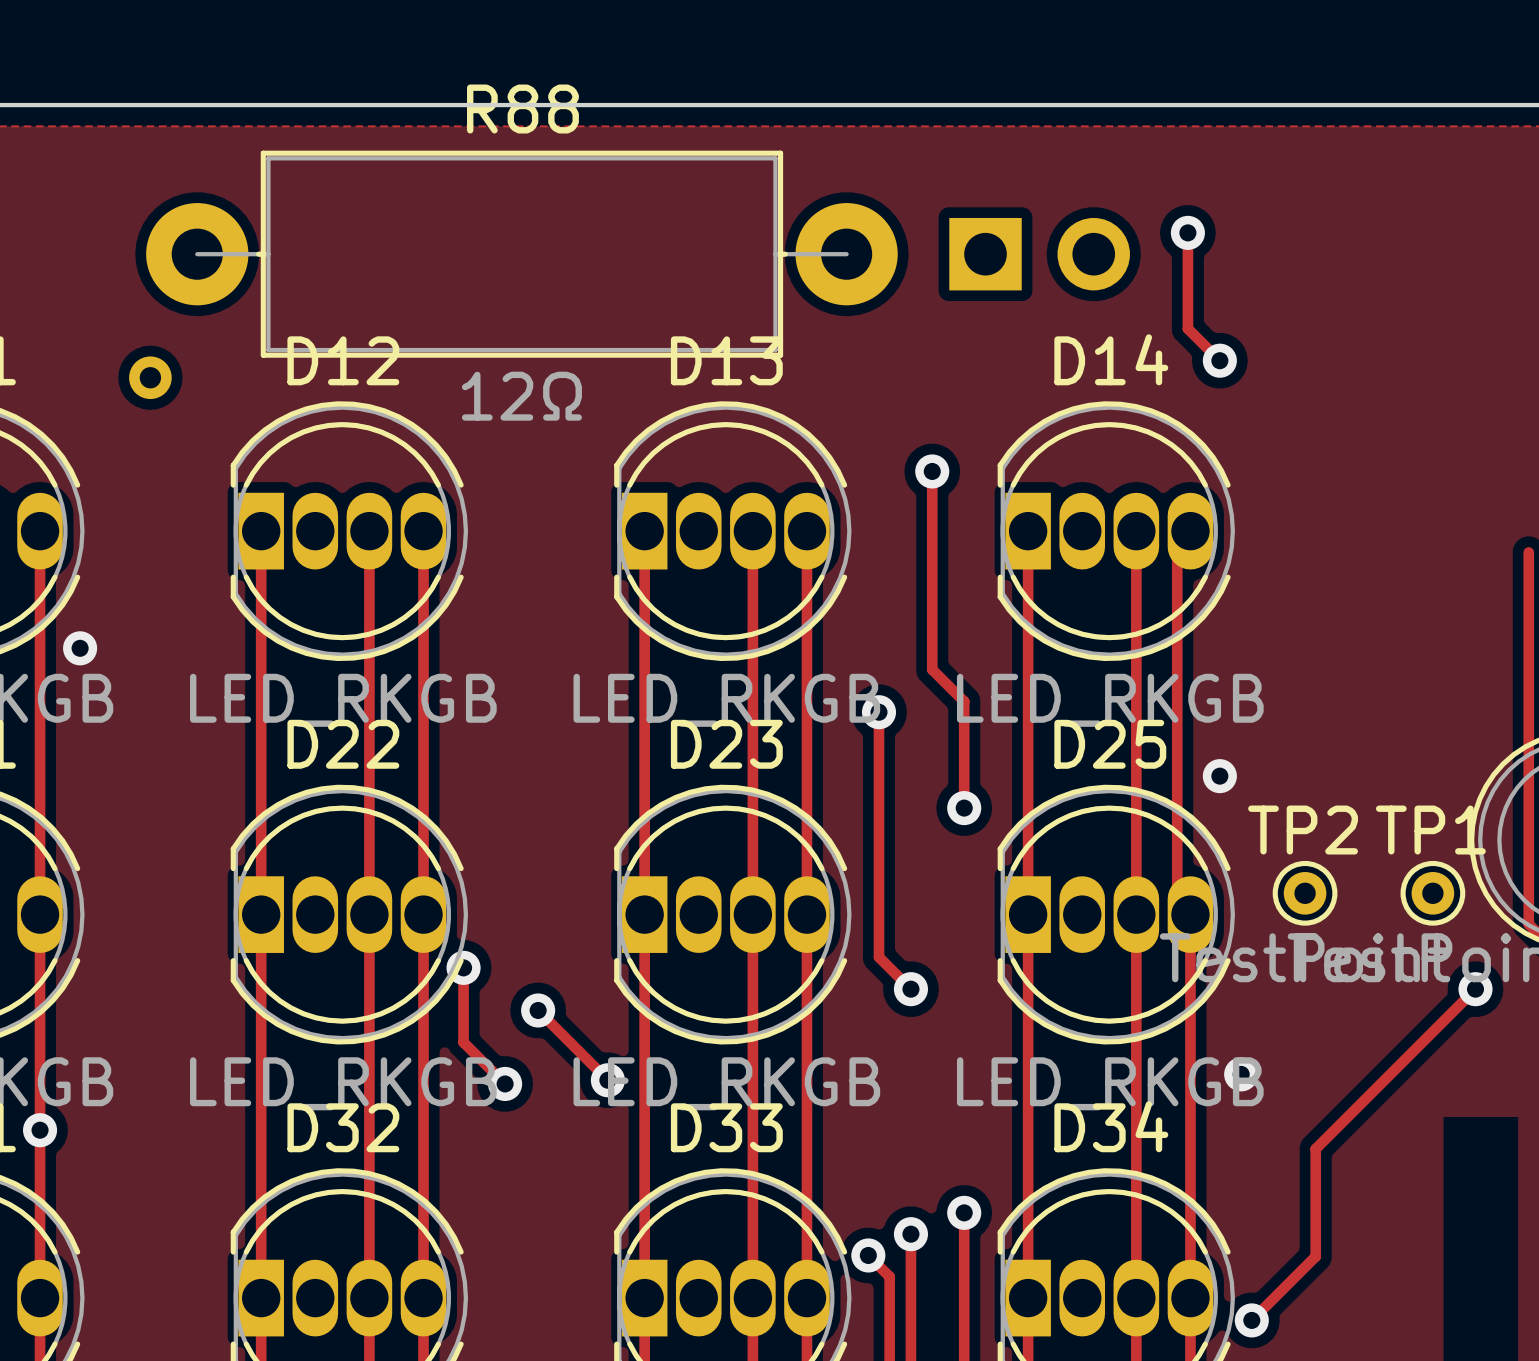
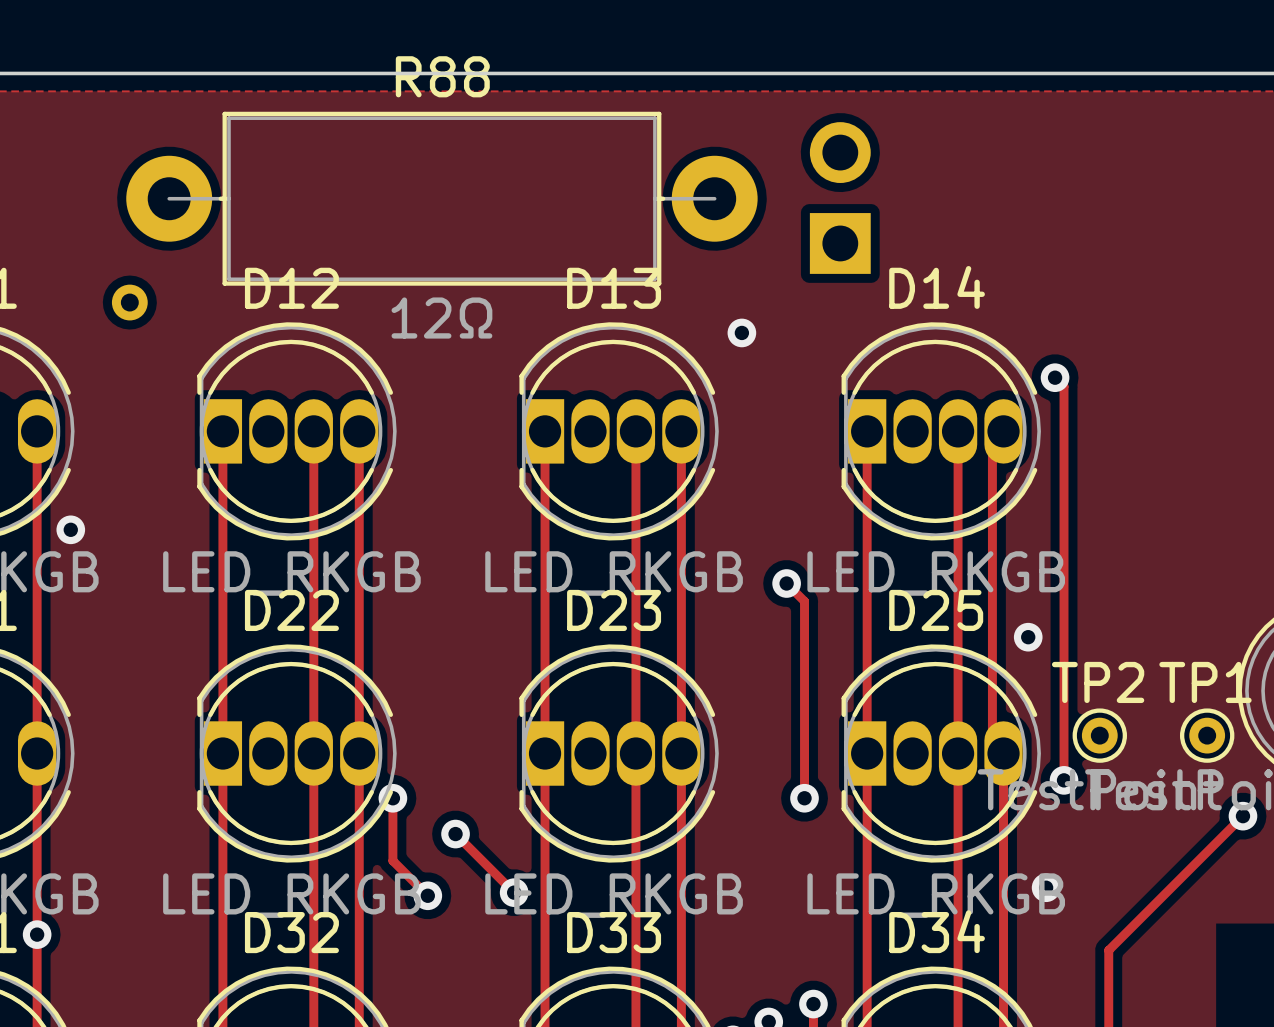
track: (1187, 232) (1187, 328) (1219, 360) -> none
via: (1187, 232) -> none
part rotation: 0° (1039, 254) -> 90° counterclockwise (840, 198)
via position: (1219, 360) -> (1055, 377)
track: none -> (1055, 377) (1064, 386) (1064, 780)
track: (932, 471) (932, 669) (964, 701) (964, 808) -> none
via position: (932, 471) -> (741, 332)
track: (878, 712) (878, 957) (910, 989) -> none
via: (878, 712) -> none
track: none -> (786, 583) (804, 601) (804, 798)
via: none -> (786, 583)
via: (964, 808) -> none
via: none -> (1064, 780)
via position: (910, 989) -> (804, 798)

